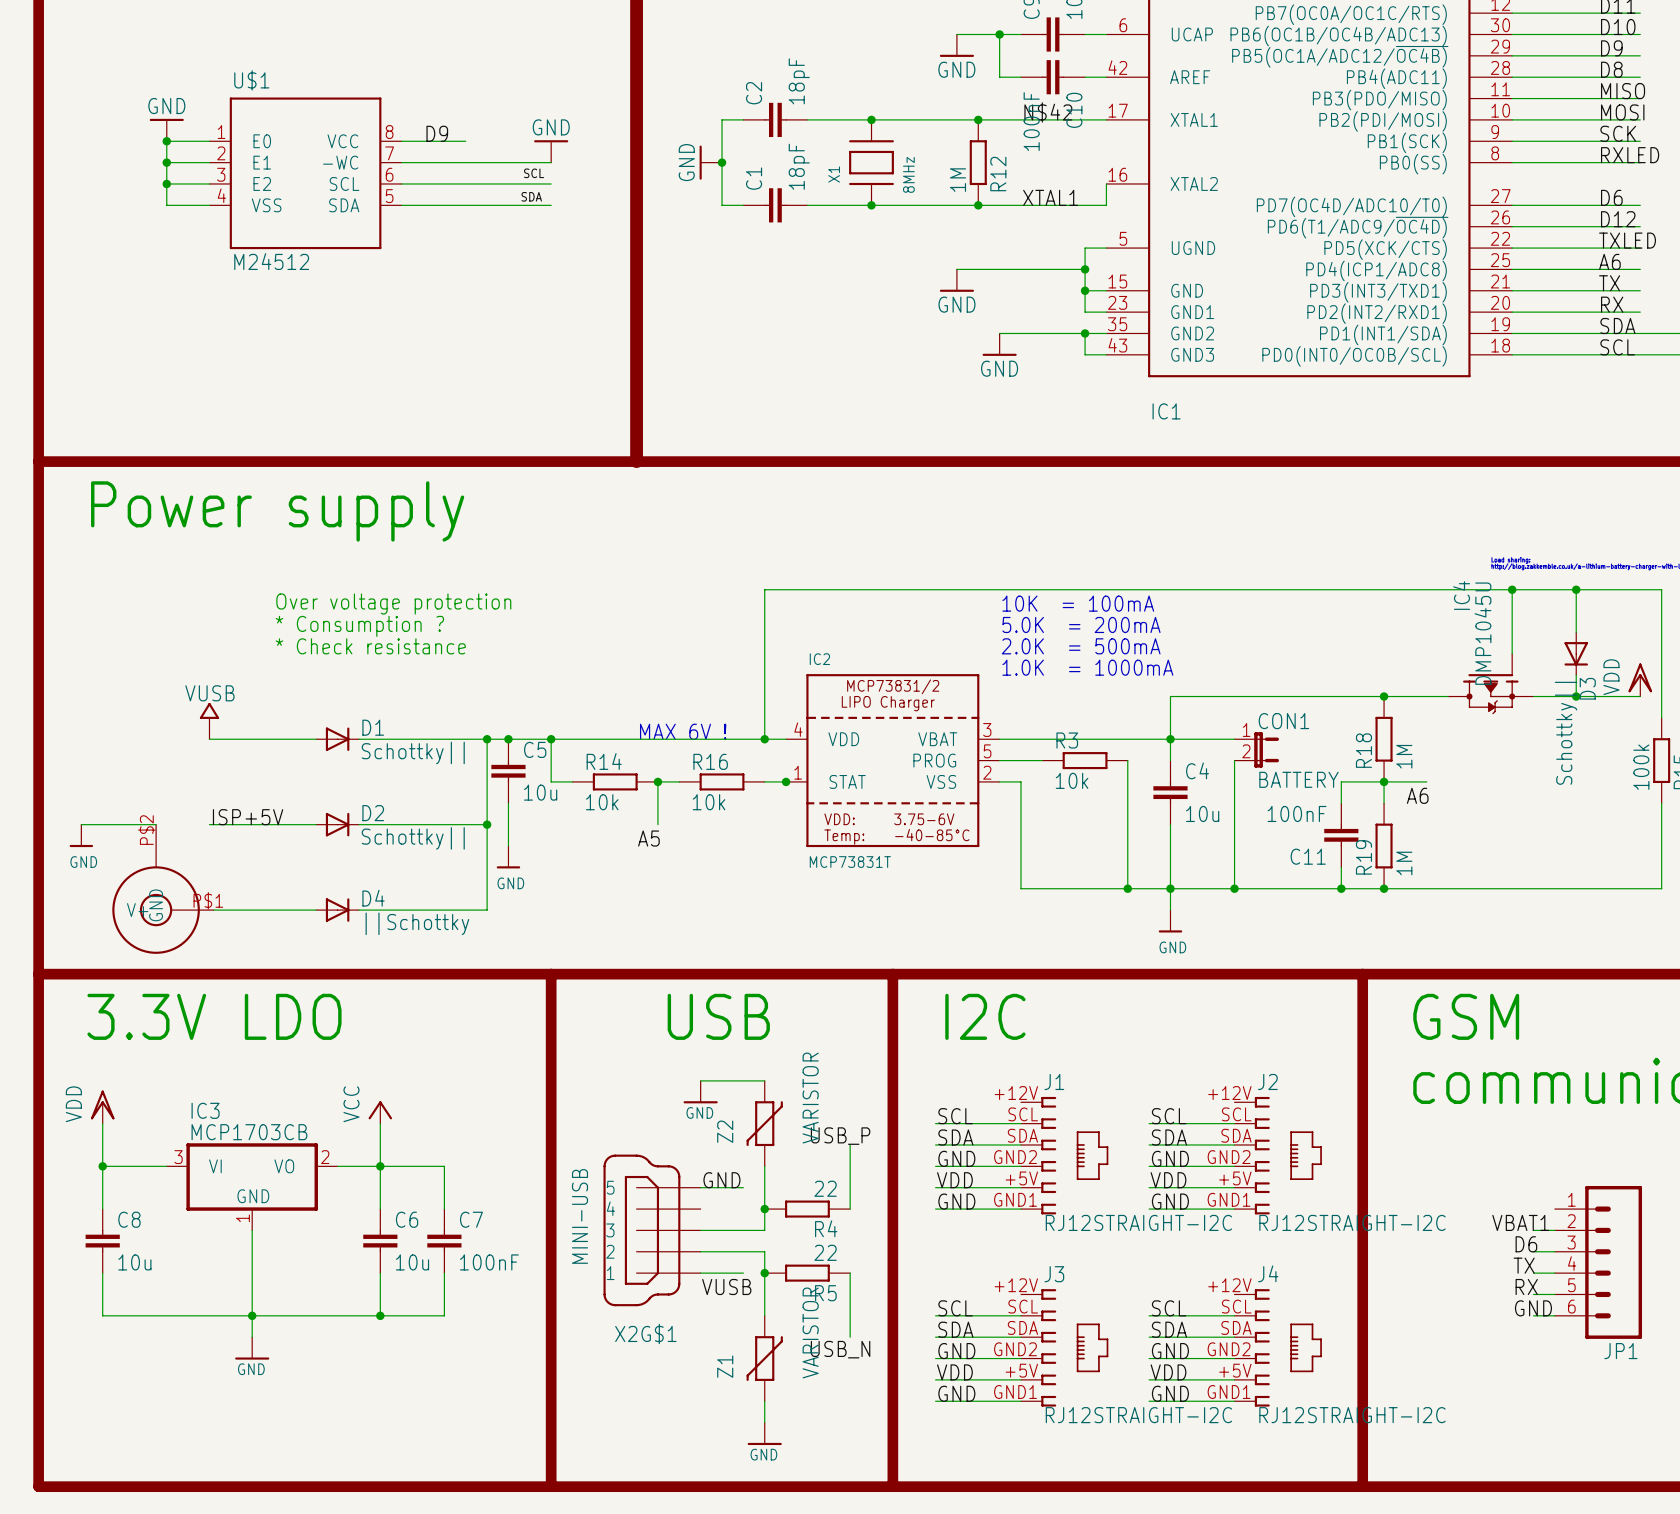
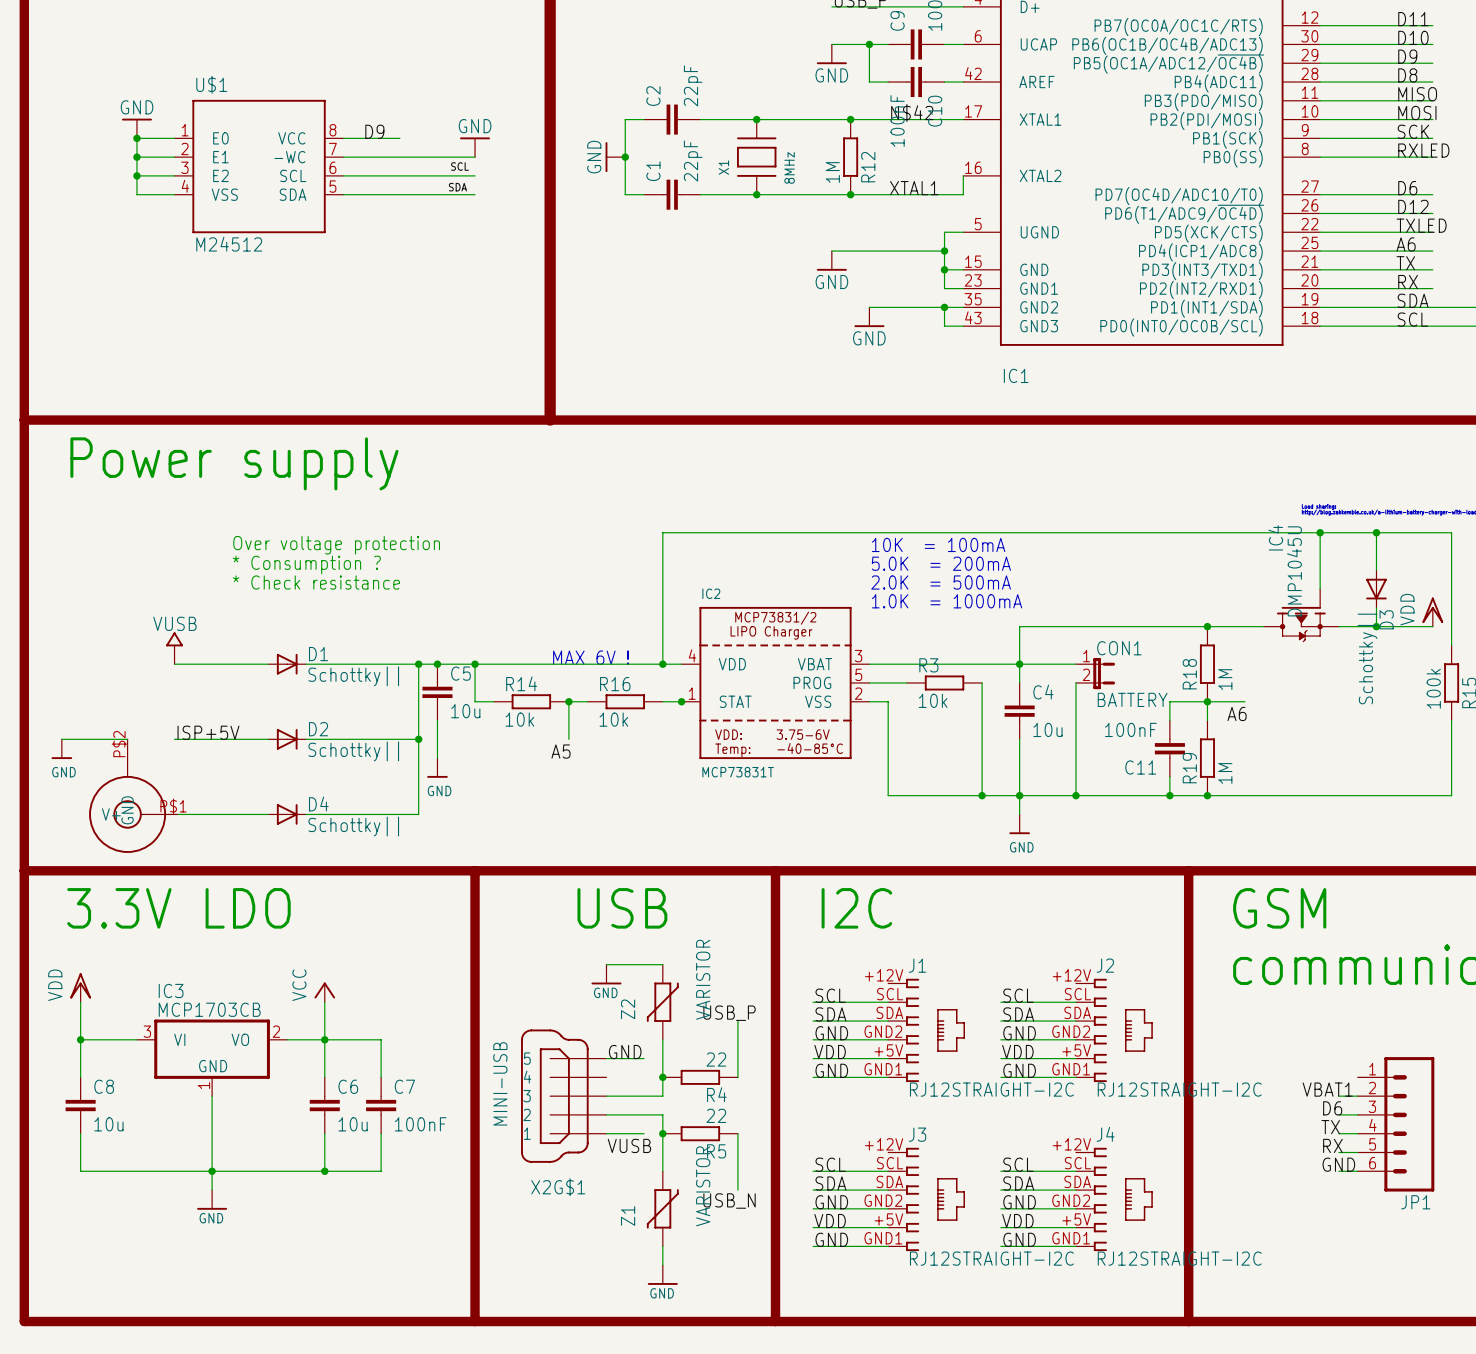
C2 value: 18pF (799, 81) -> 22pF (693, 85)
C1 value: 18pF (799, 166) -> 22pF (693, 161)
D4 value: ||Schottky (417, 923) -> Schottky|| (353, 826)

